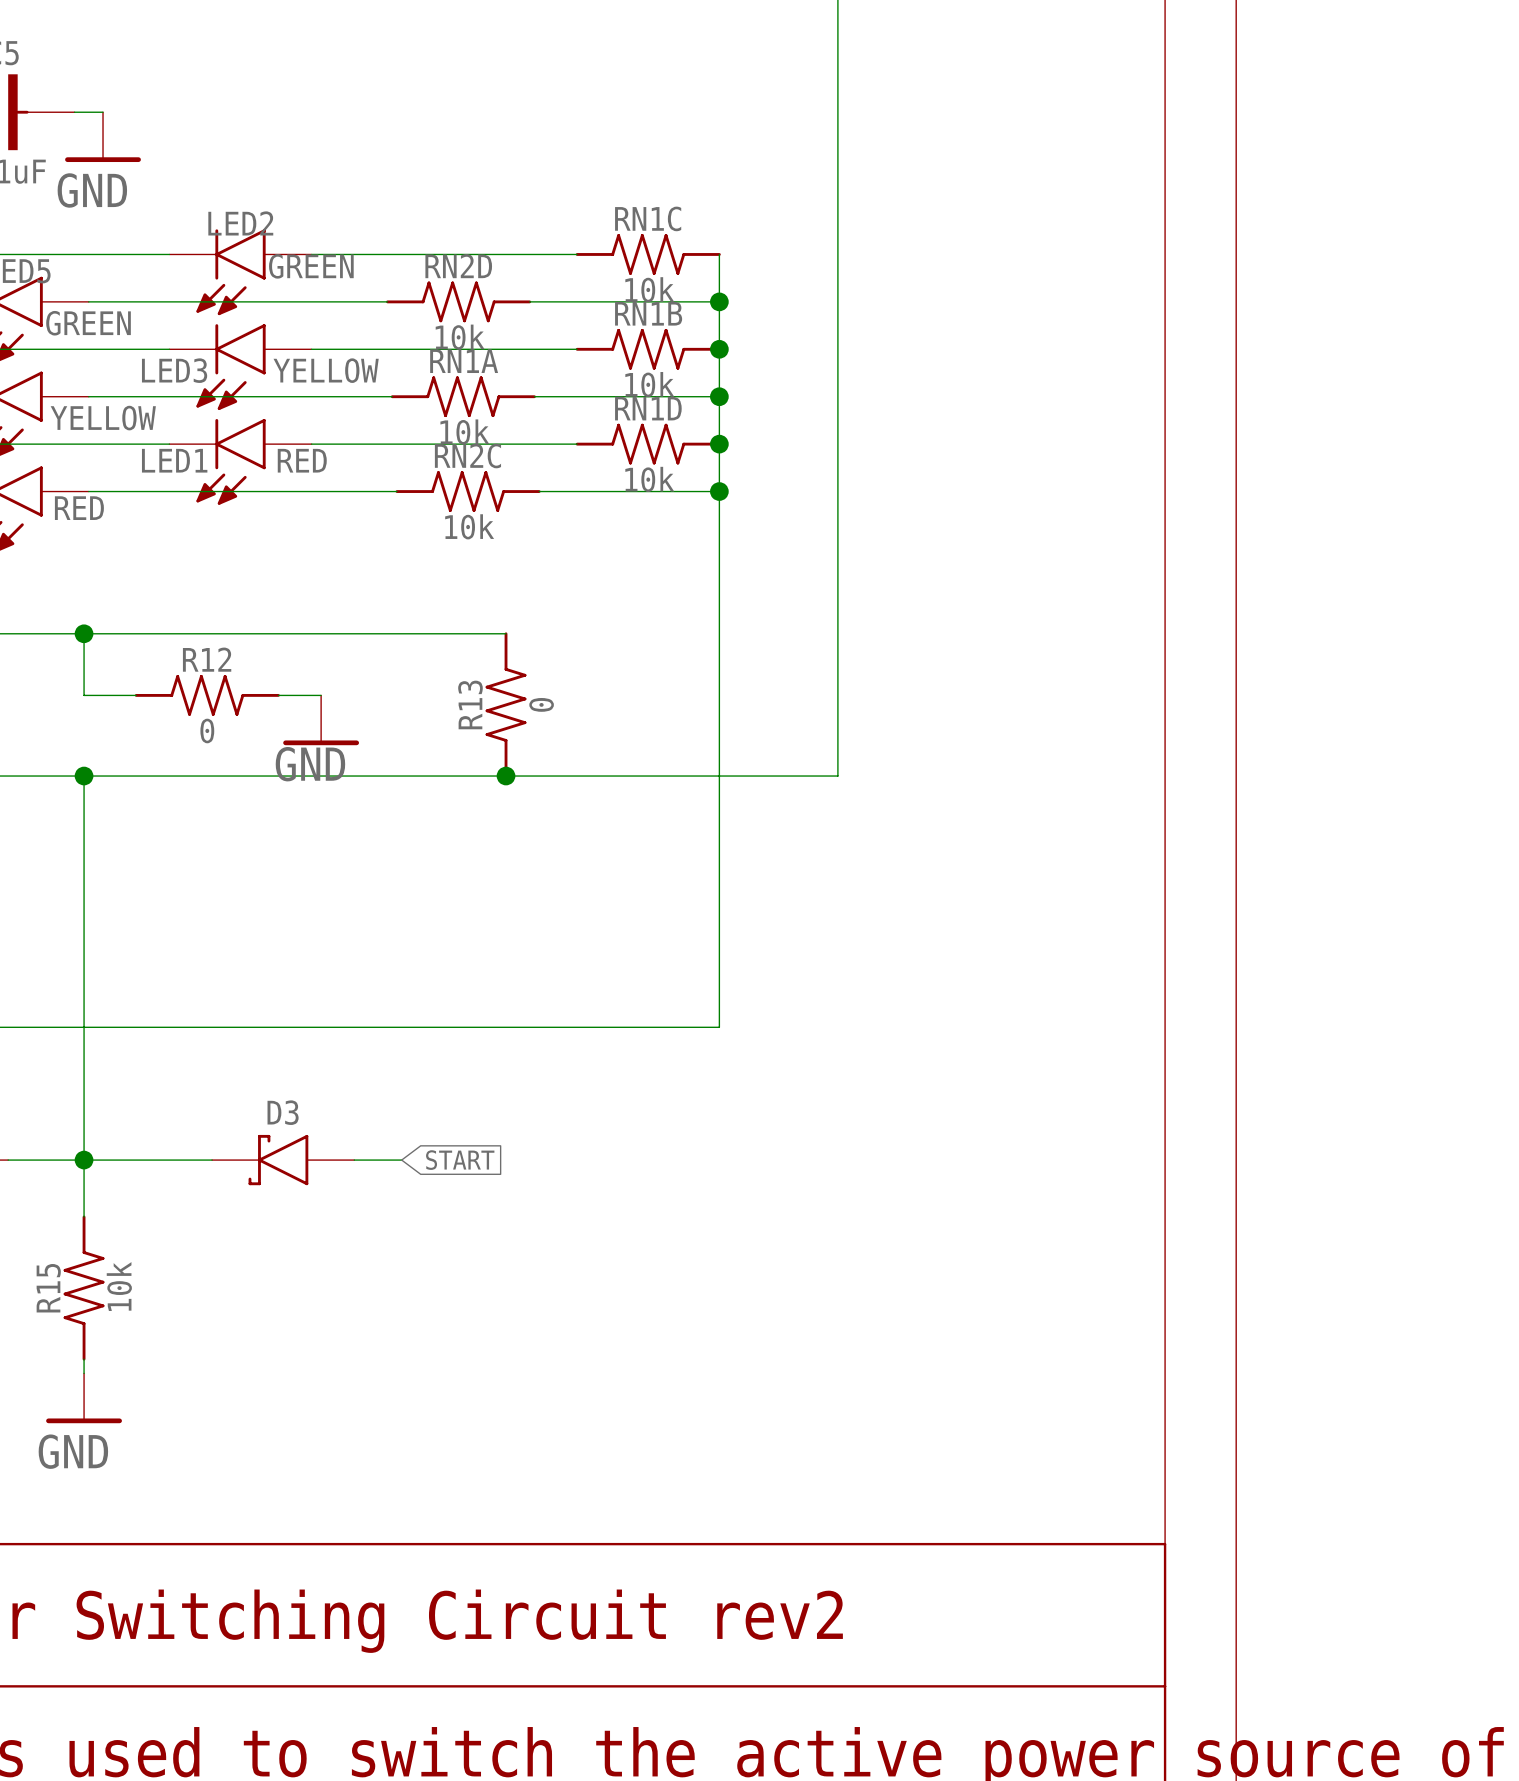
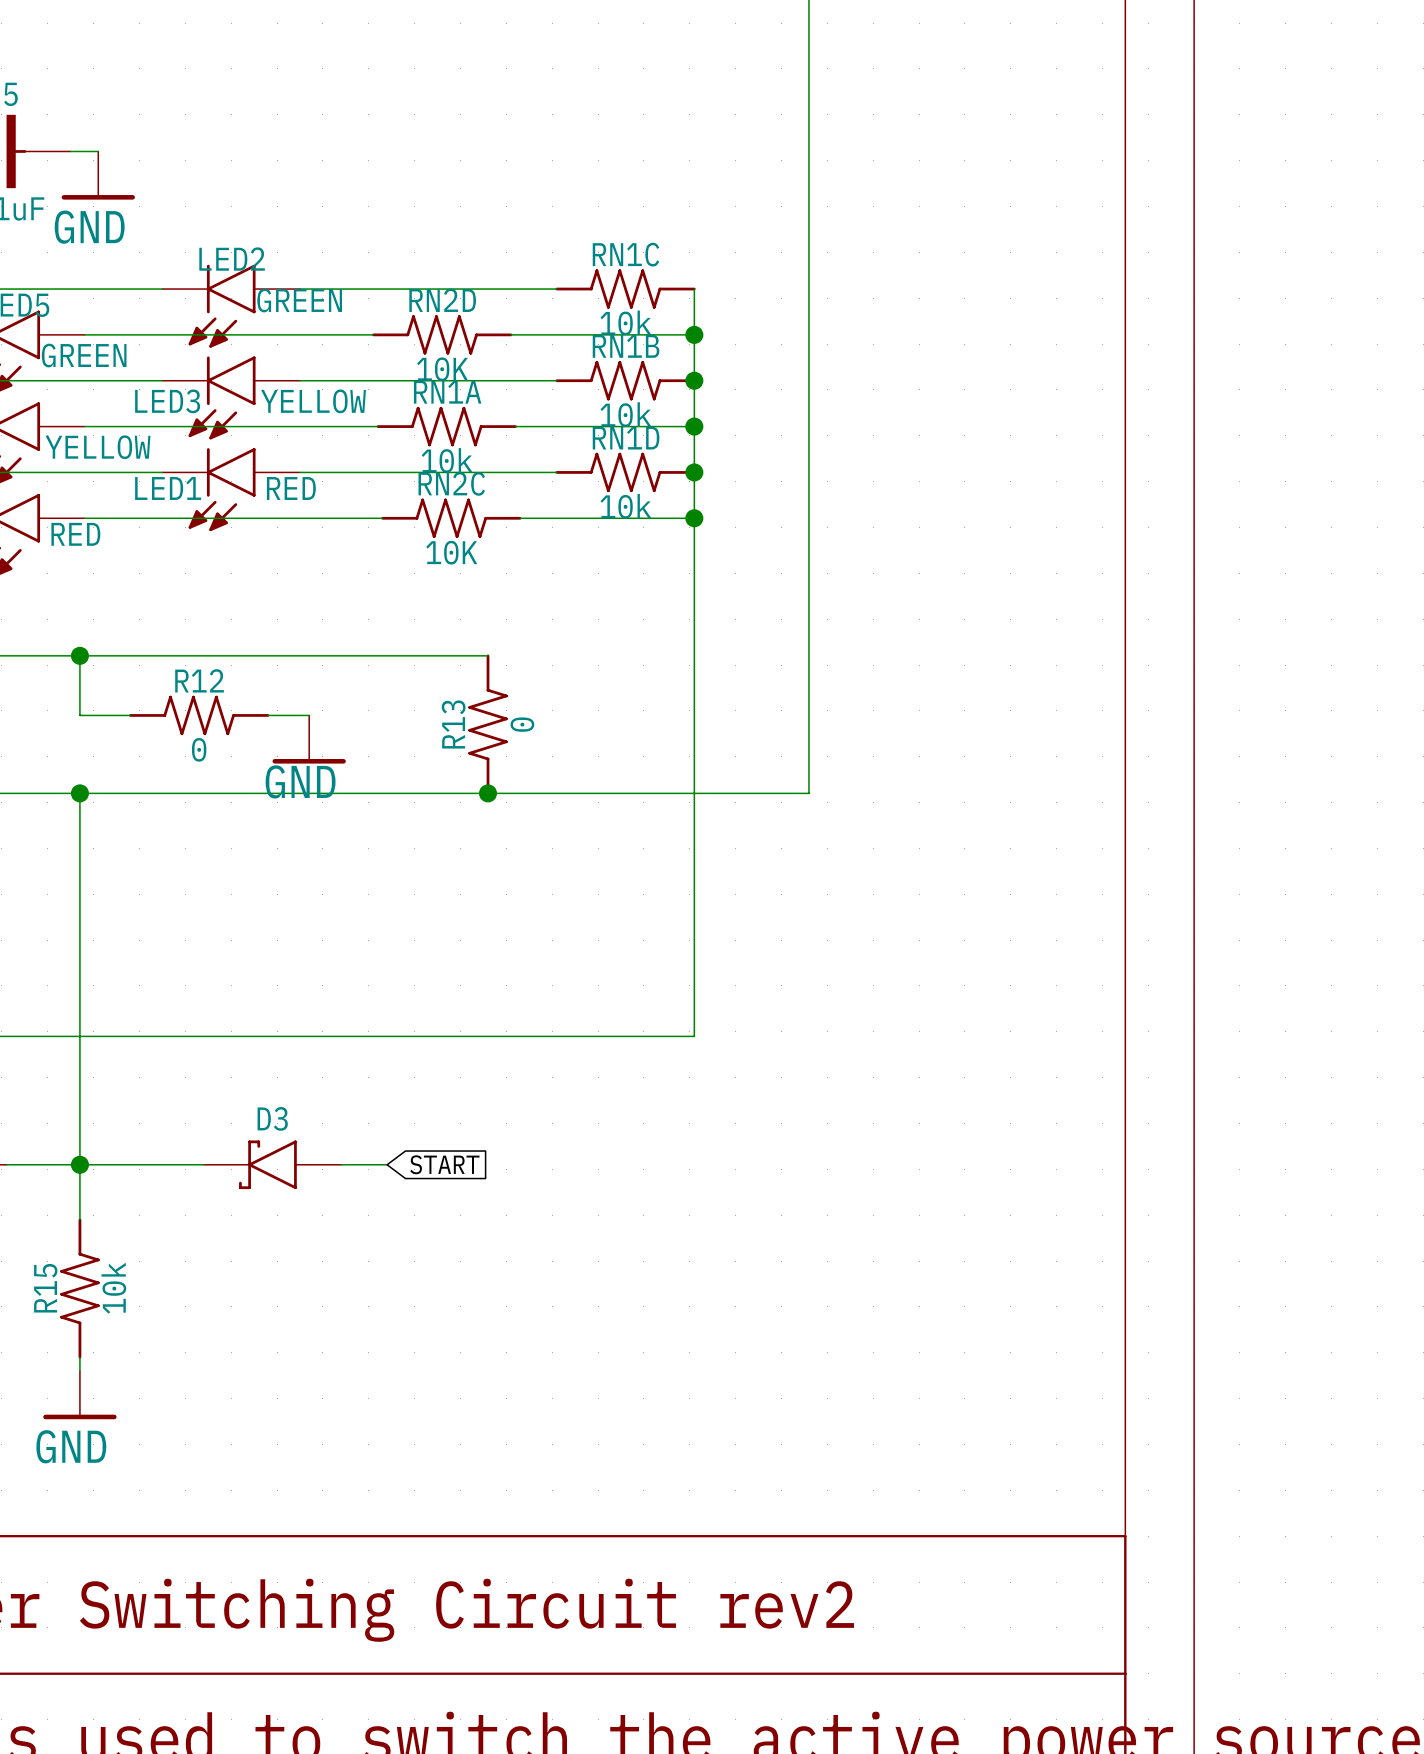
RN2D text: 10k (460, 337) -> 10K (442, 369)
RN2C text: 10k (469, 526) -> 10K (451, 552)

